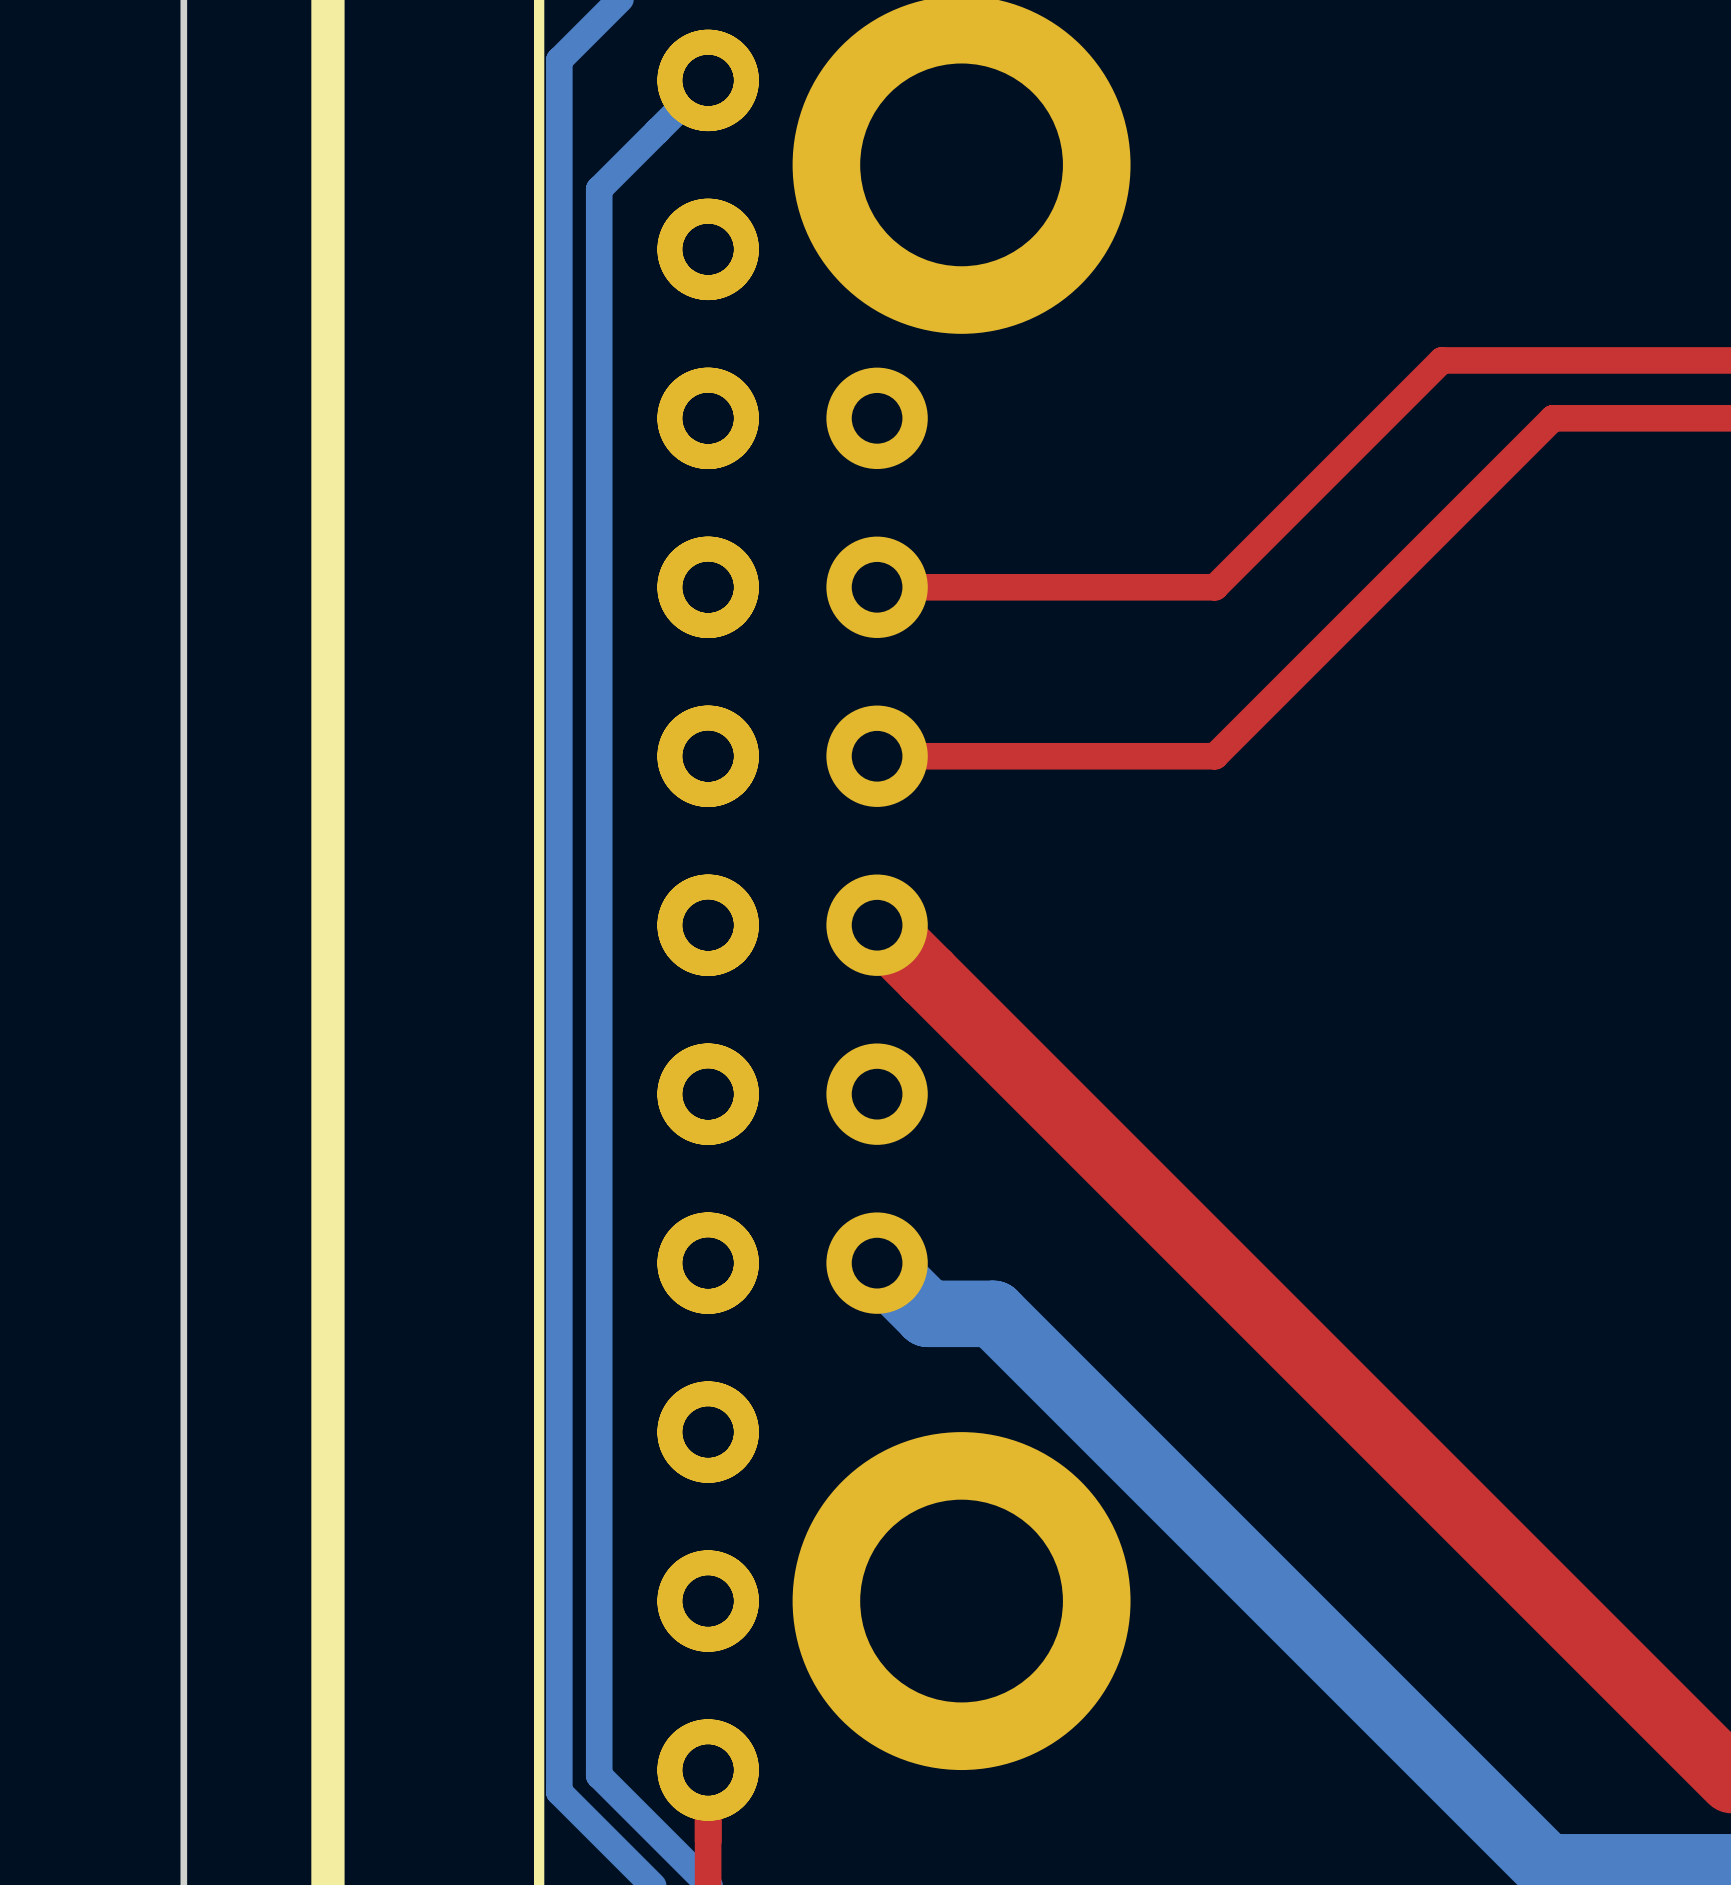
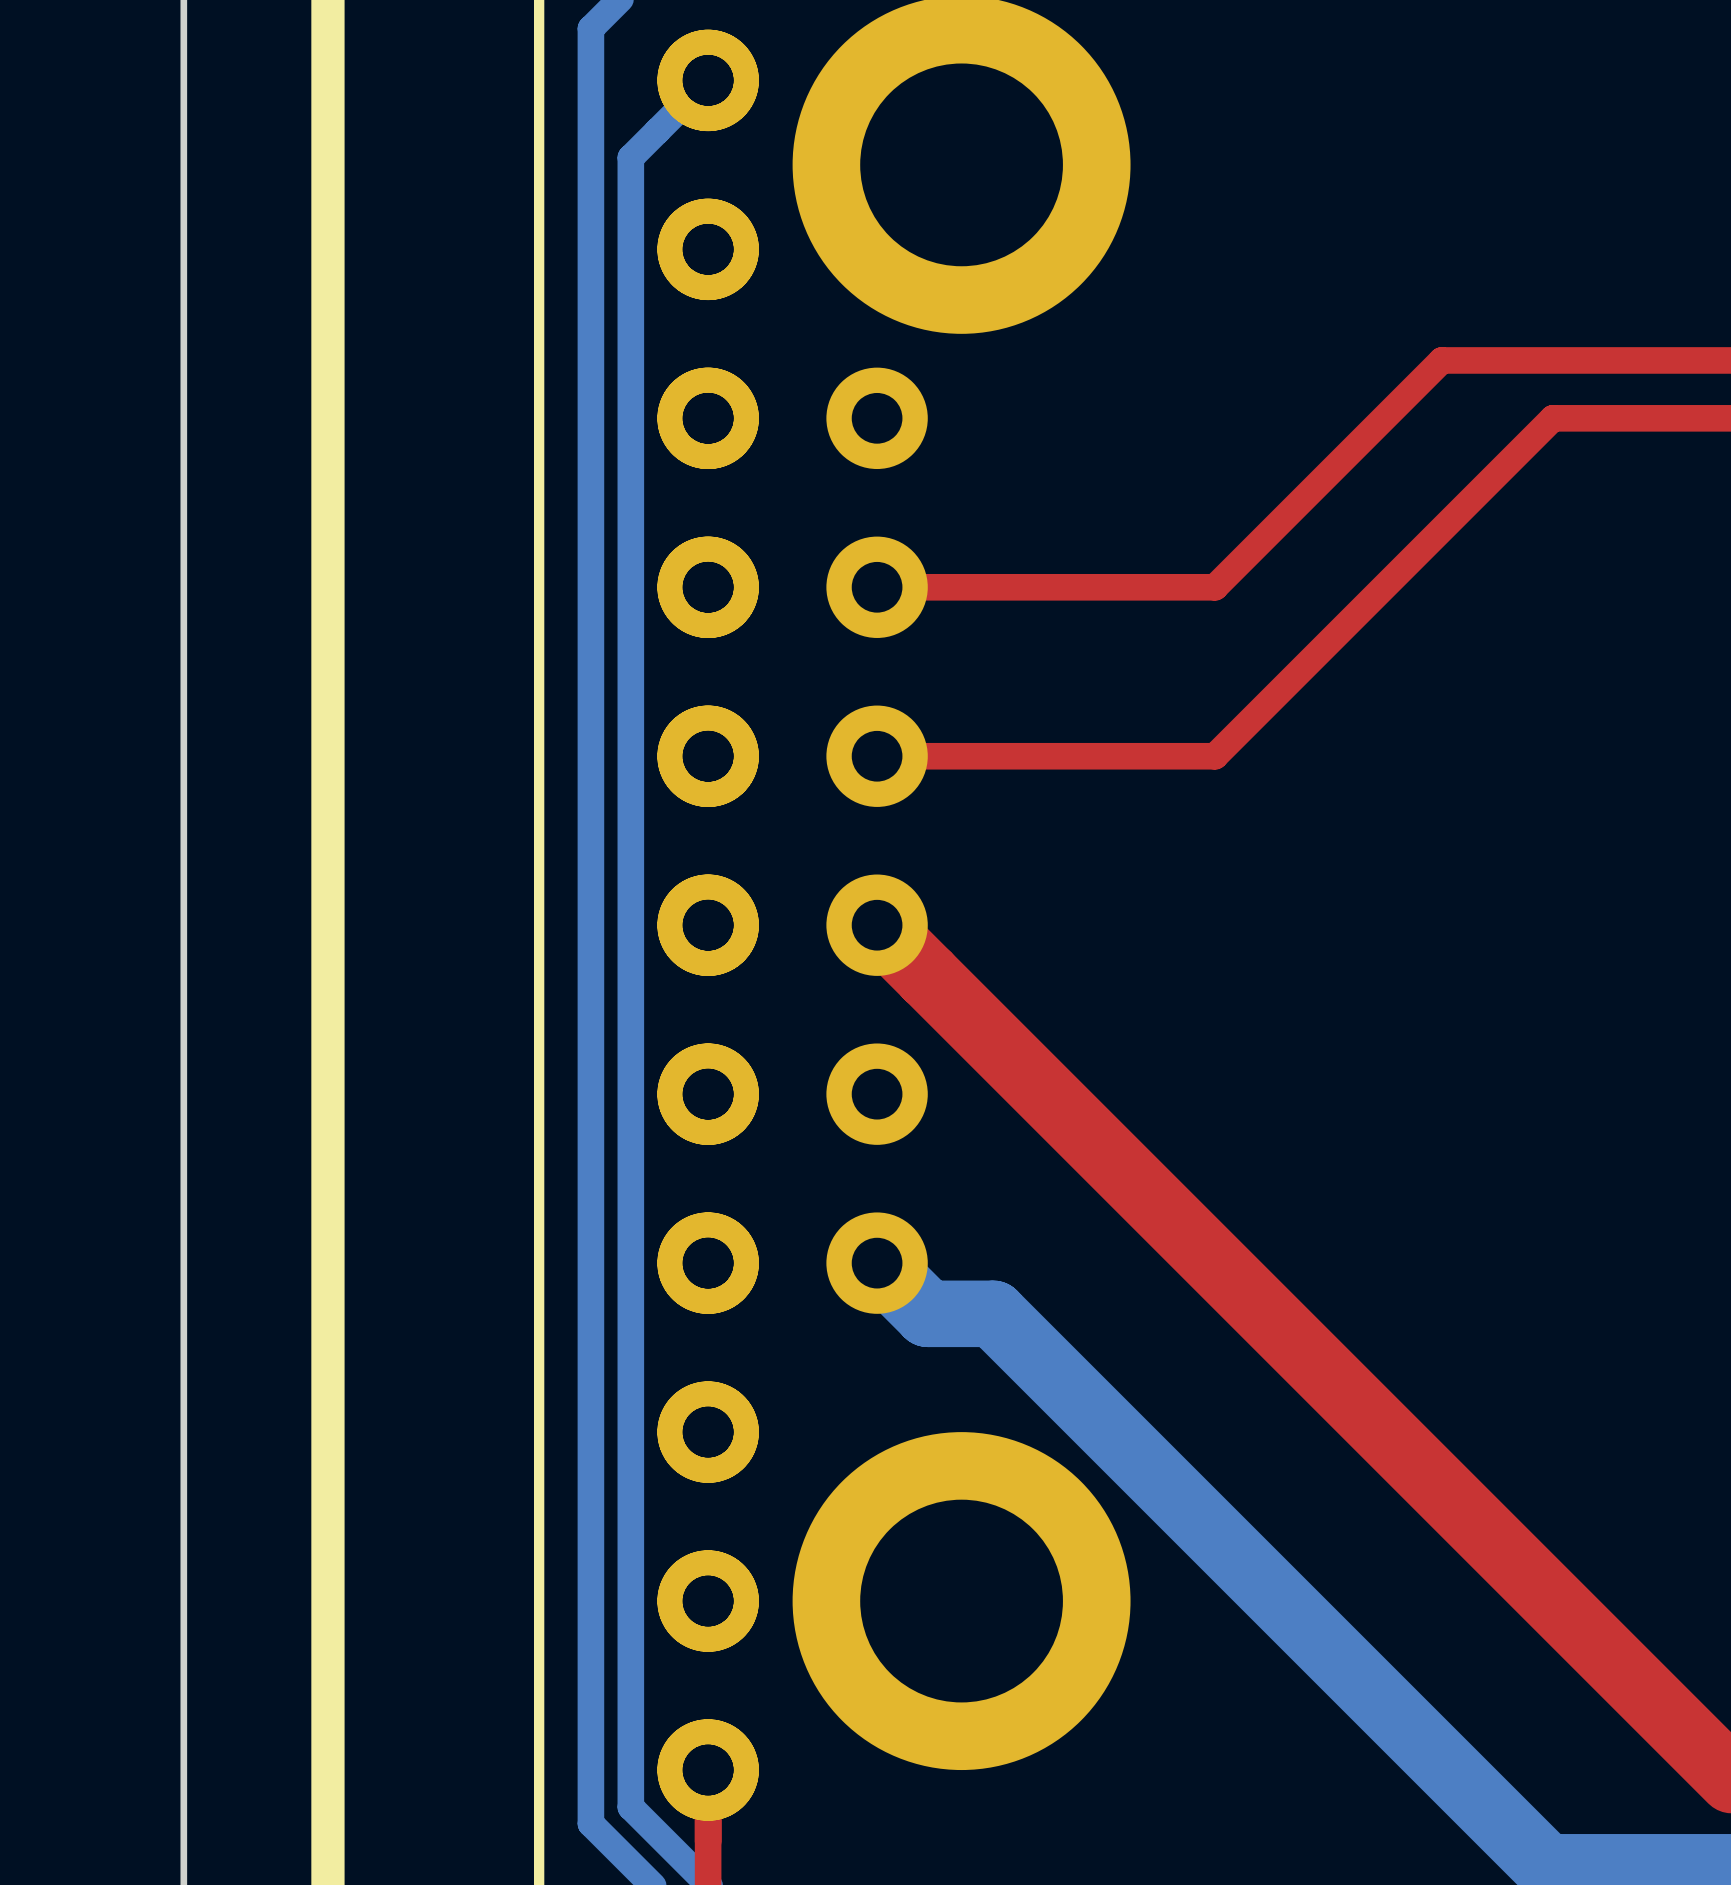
bottom track: (590, 28) (559, 60) (559, 1792) (590, 1823) -> (590, 28) (590, 1823)
bottom track: (630, 157) (599, 189) (599, 1775) (630, 1807) -> (630, 157) (630, 1807)

